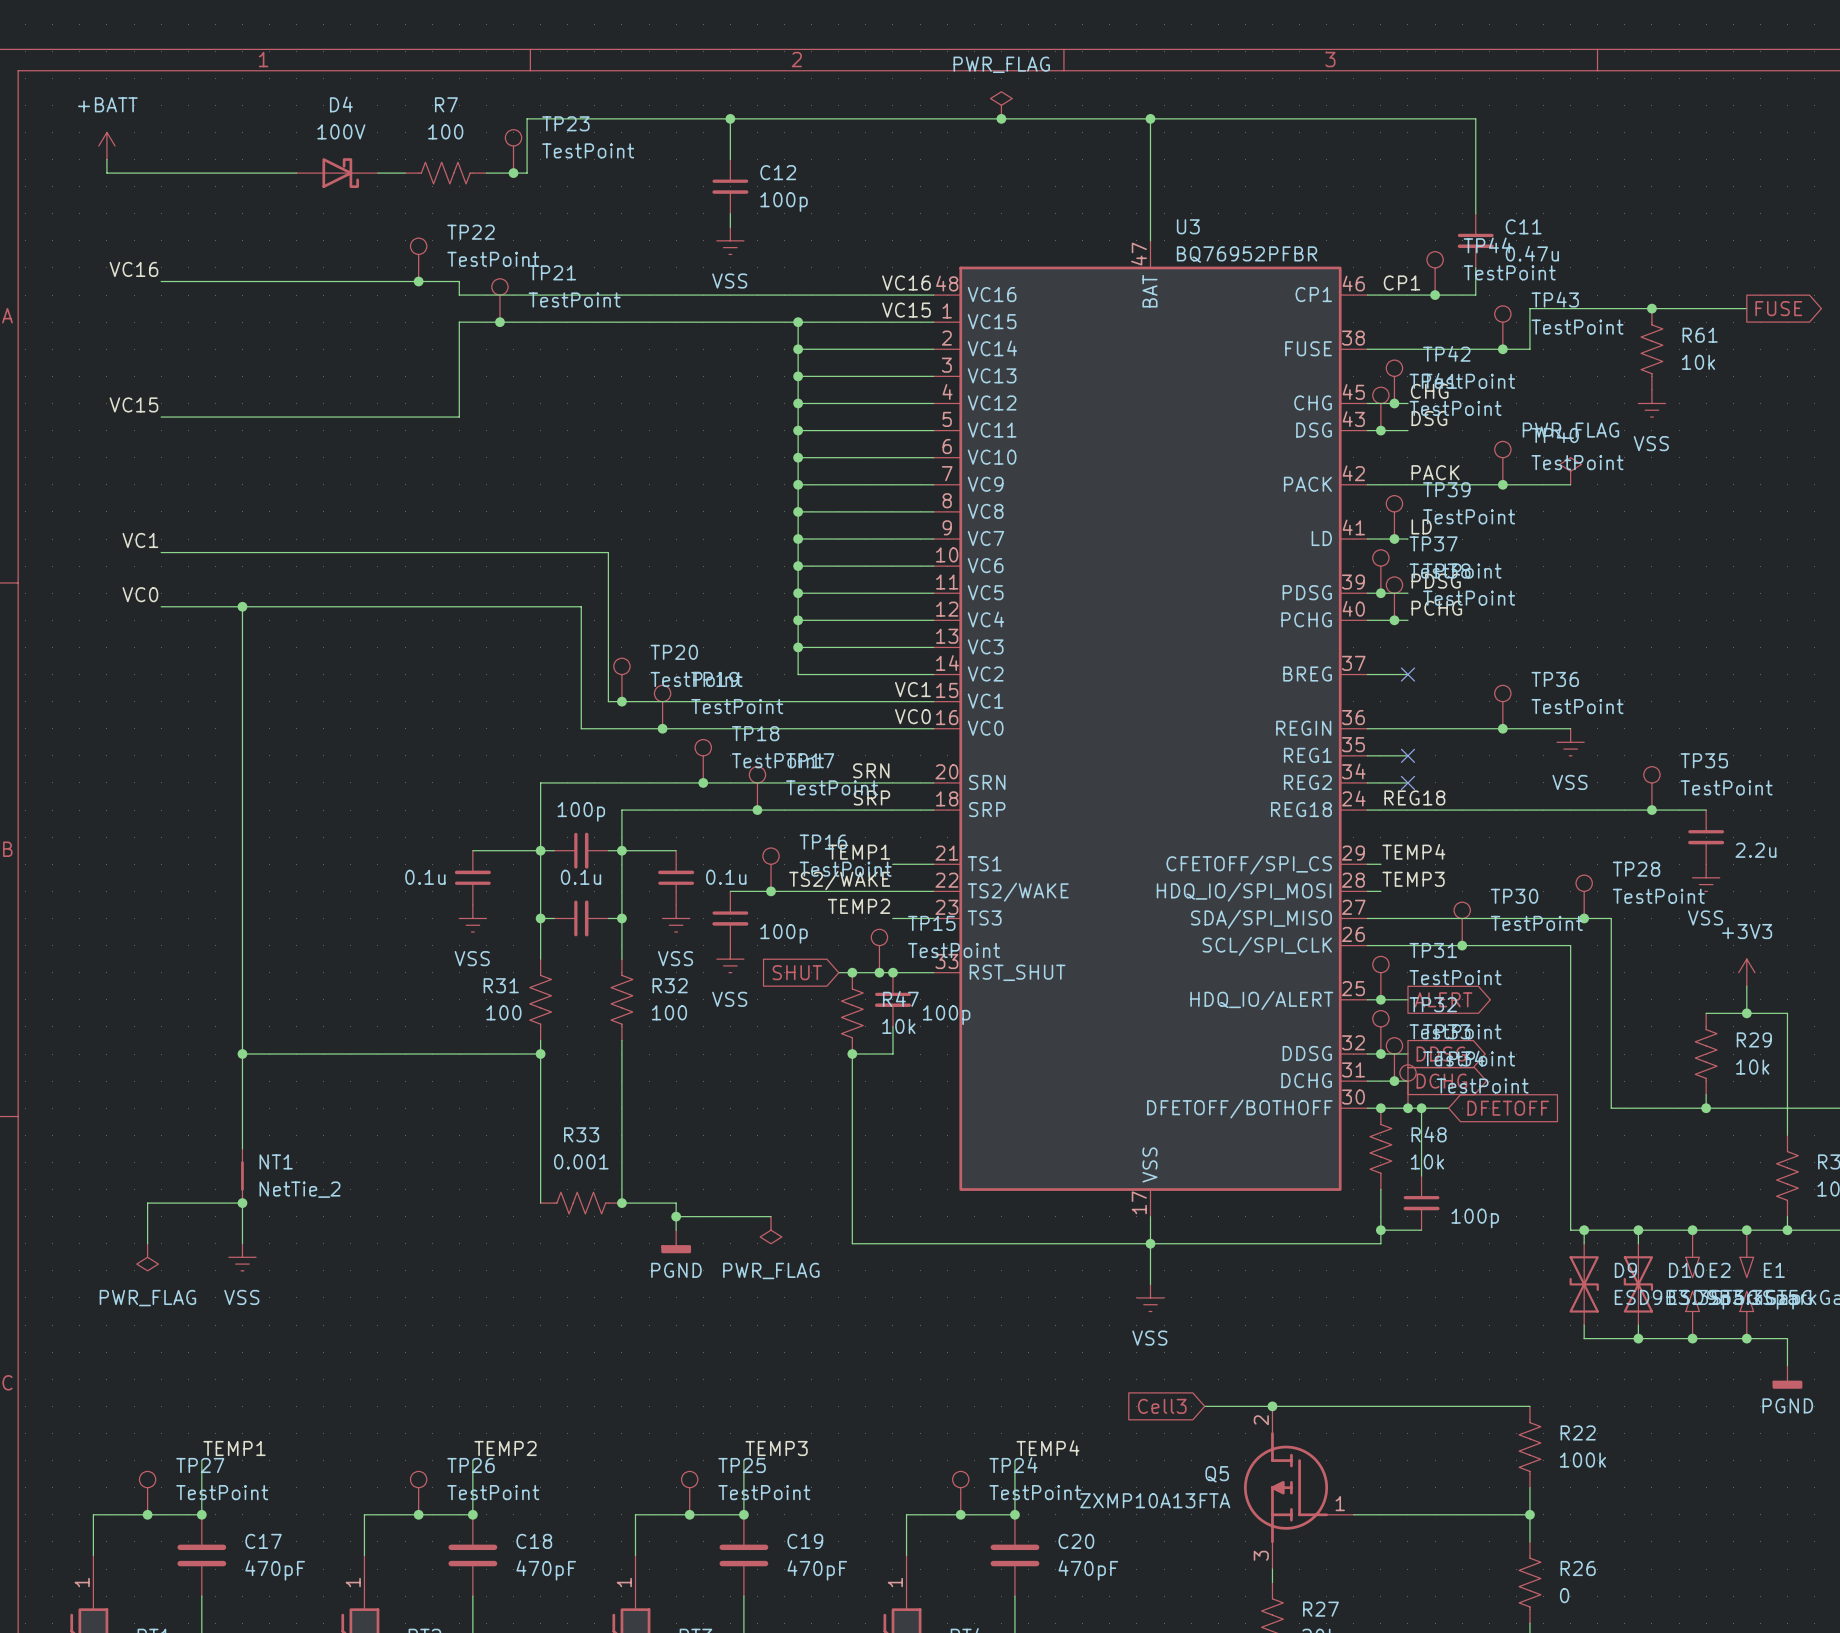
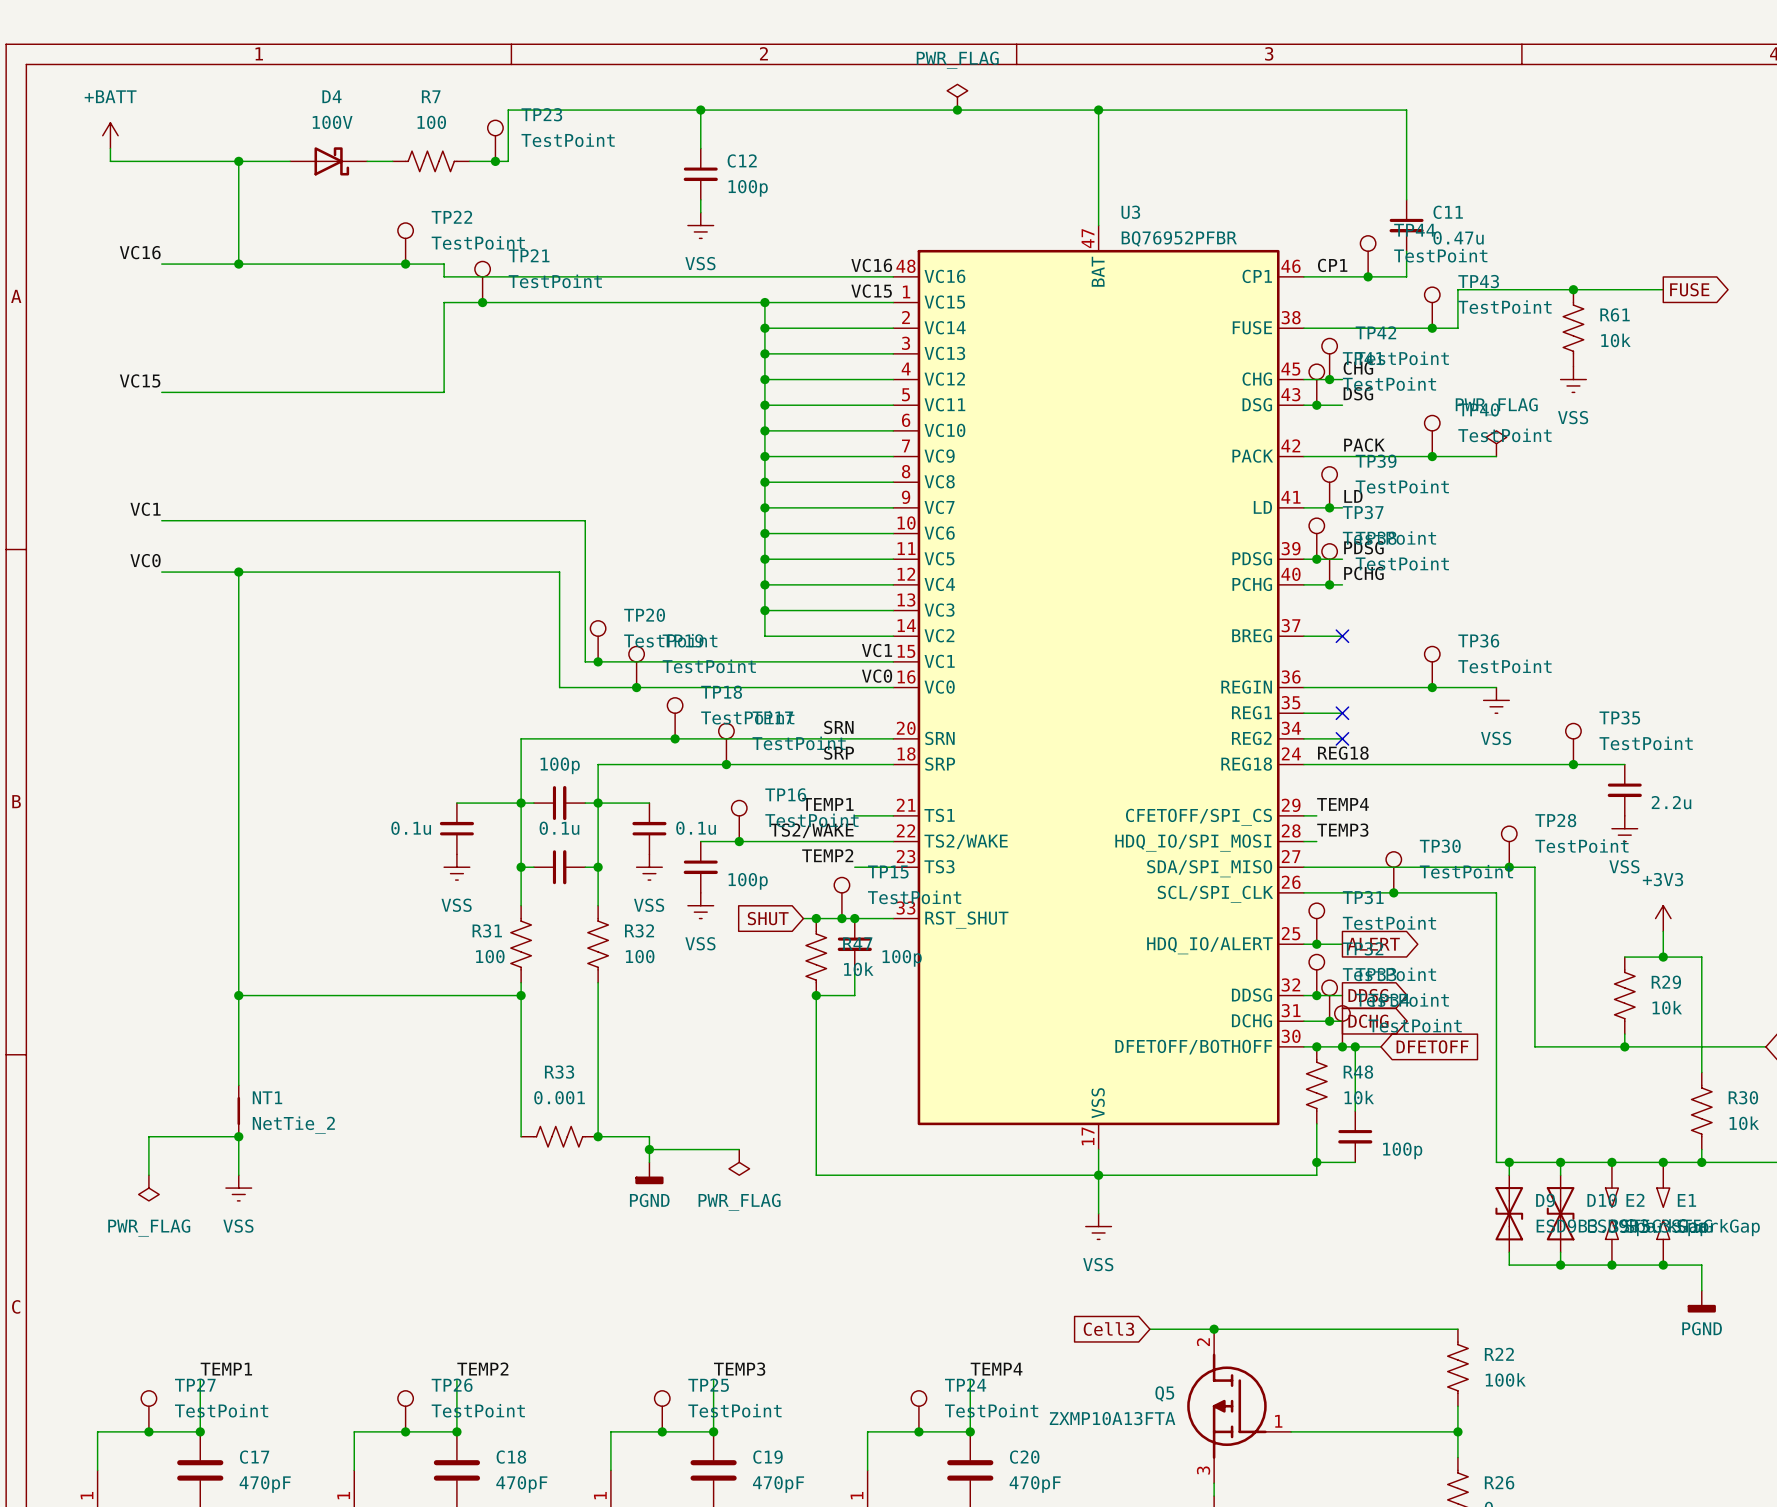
wire: none -> (238, 161) (238, 264)
junction: none -> (238, 161)
junction: none -> (238, 264)

